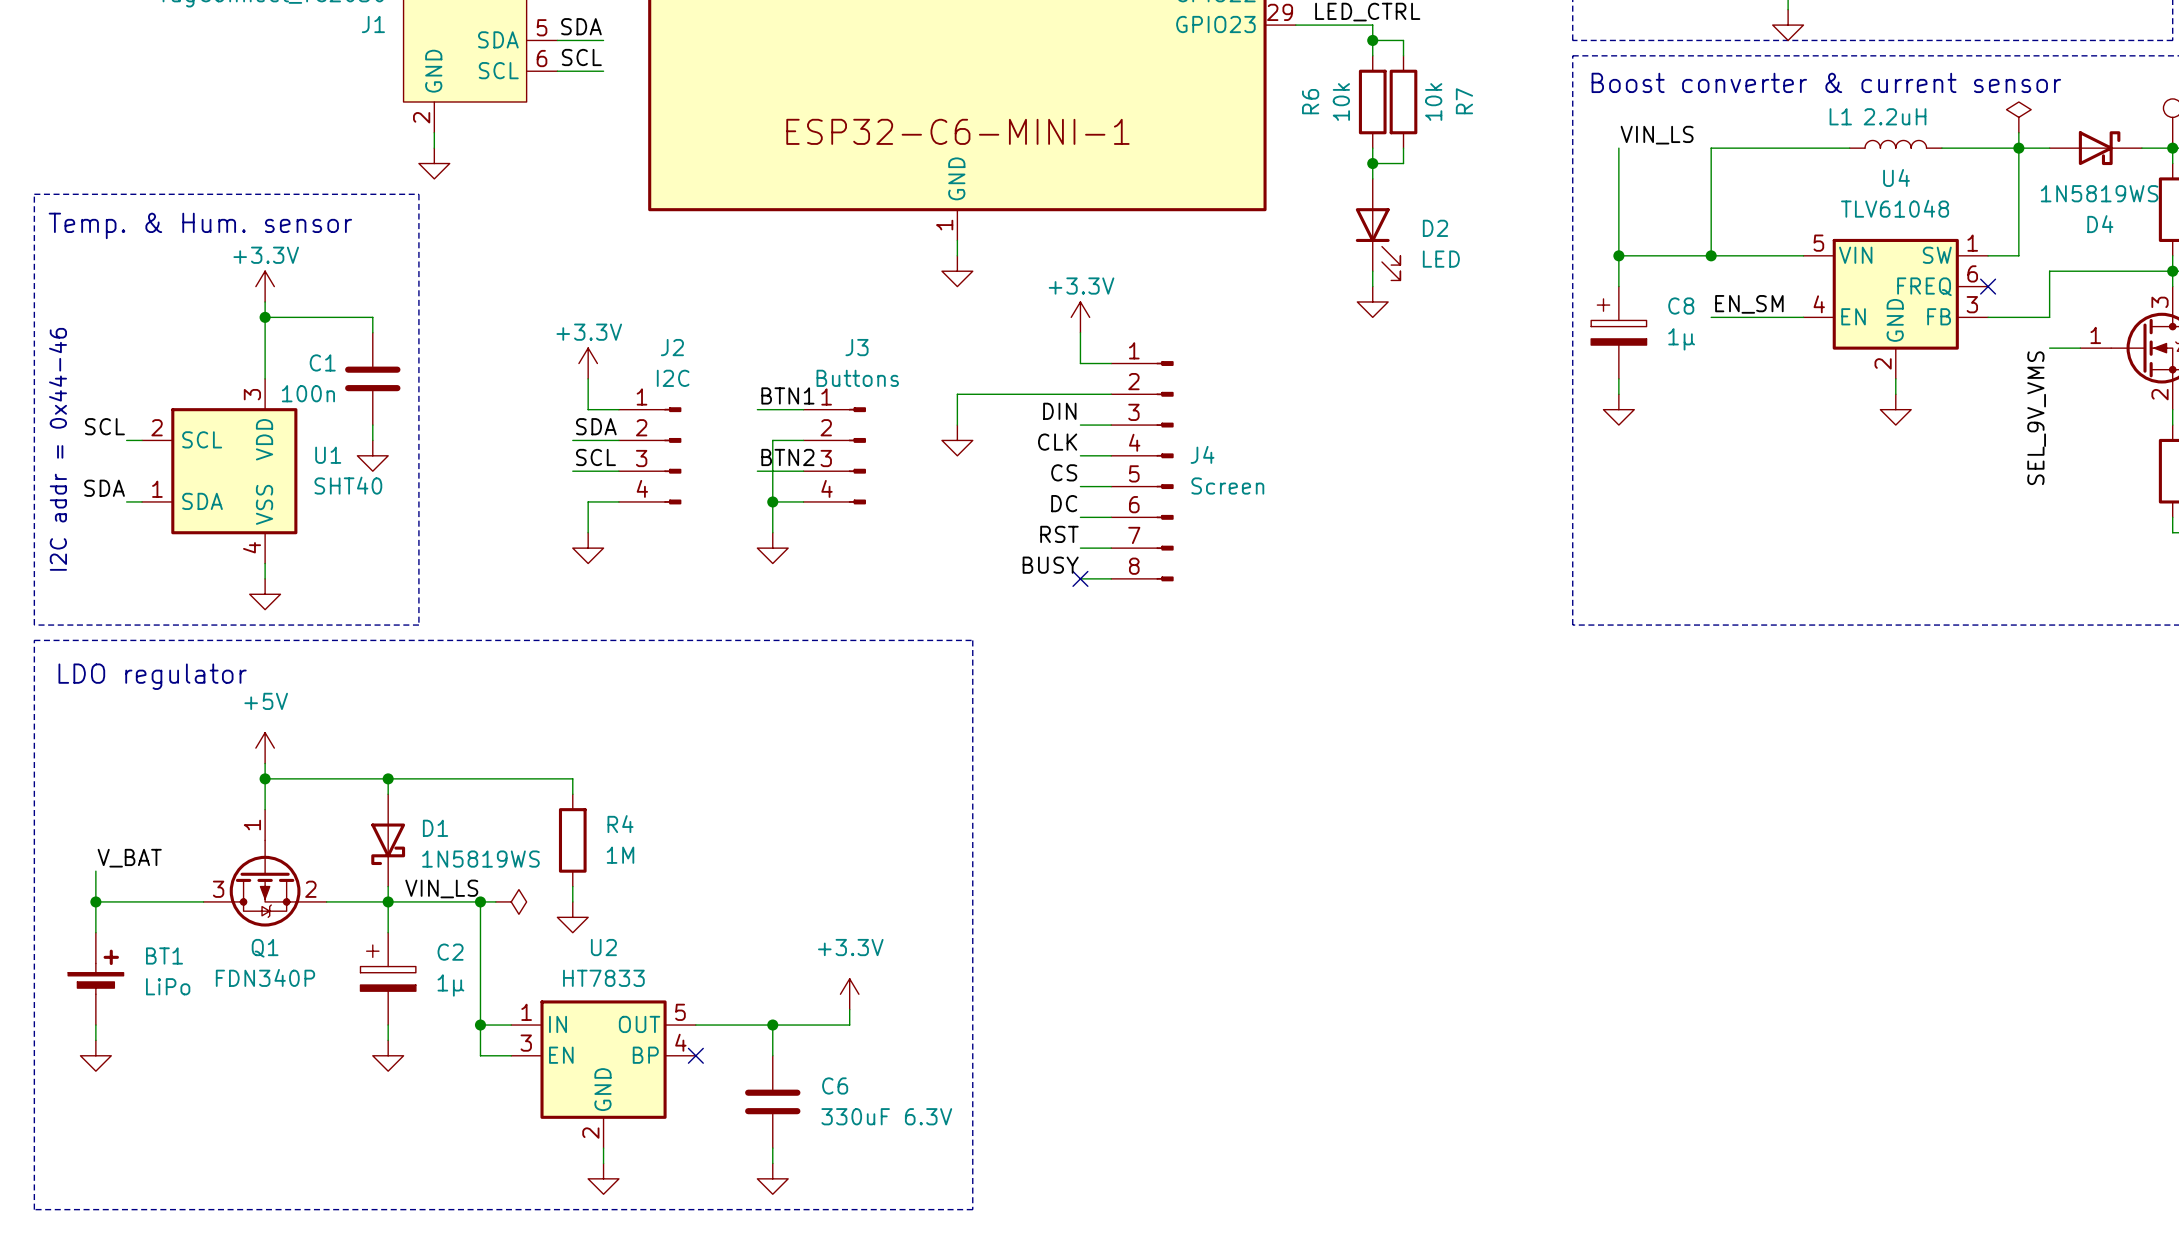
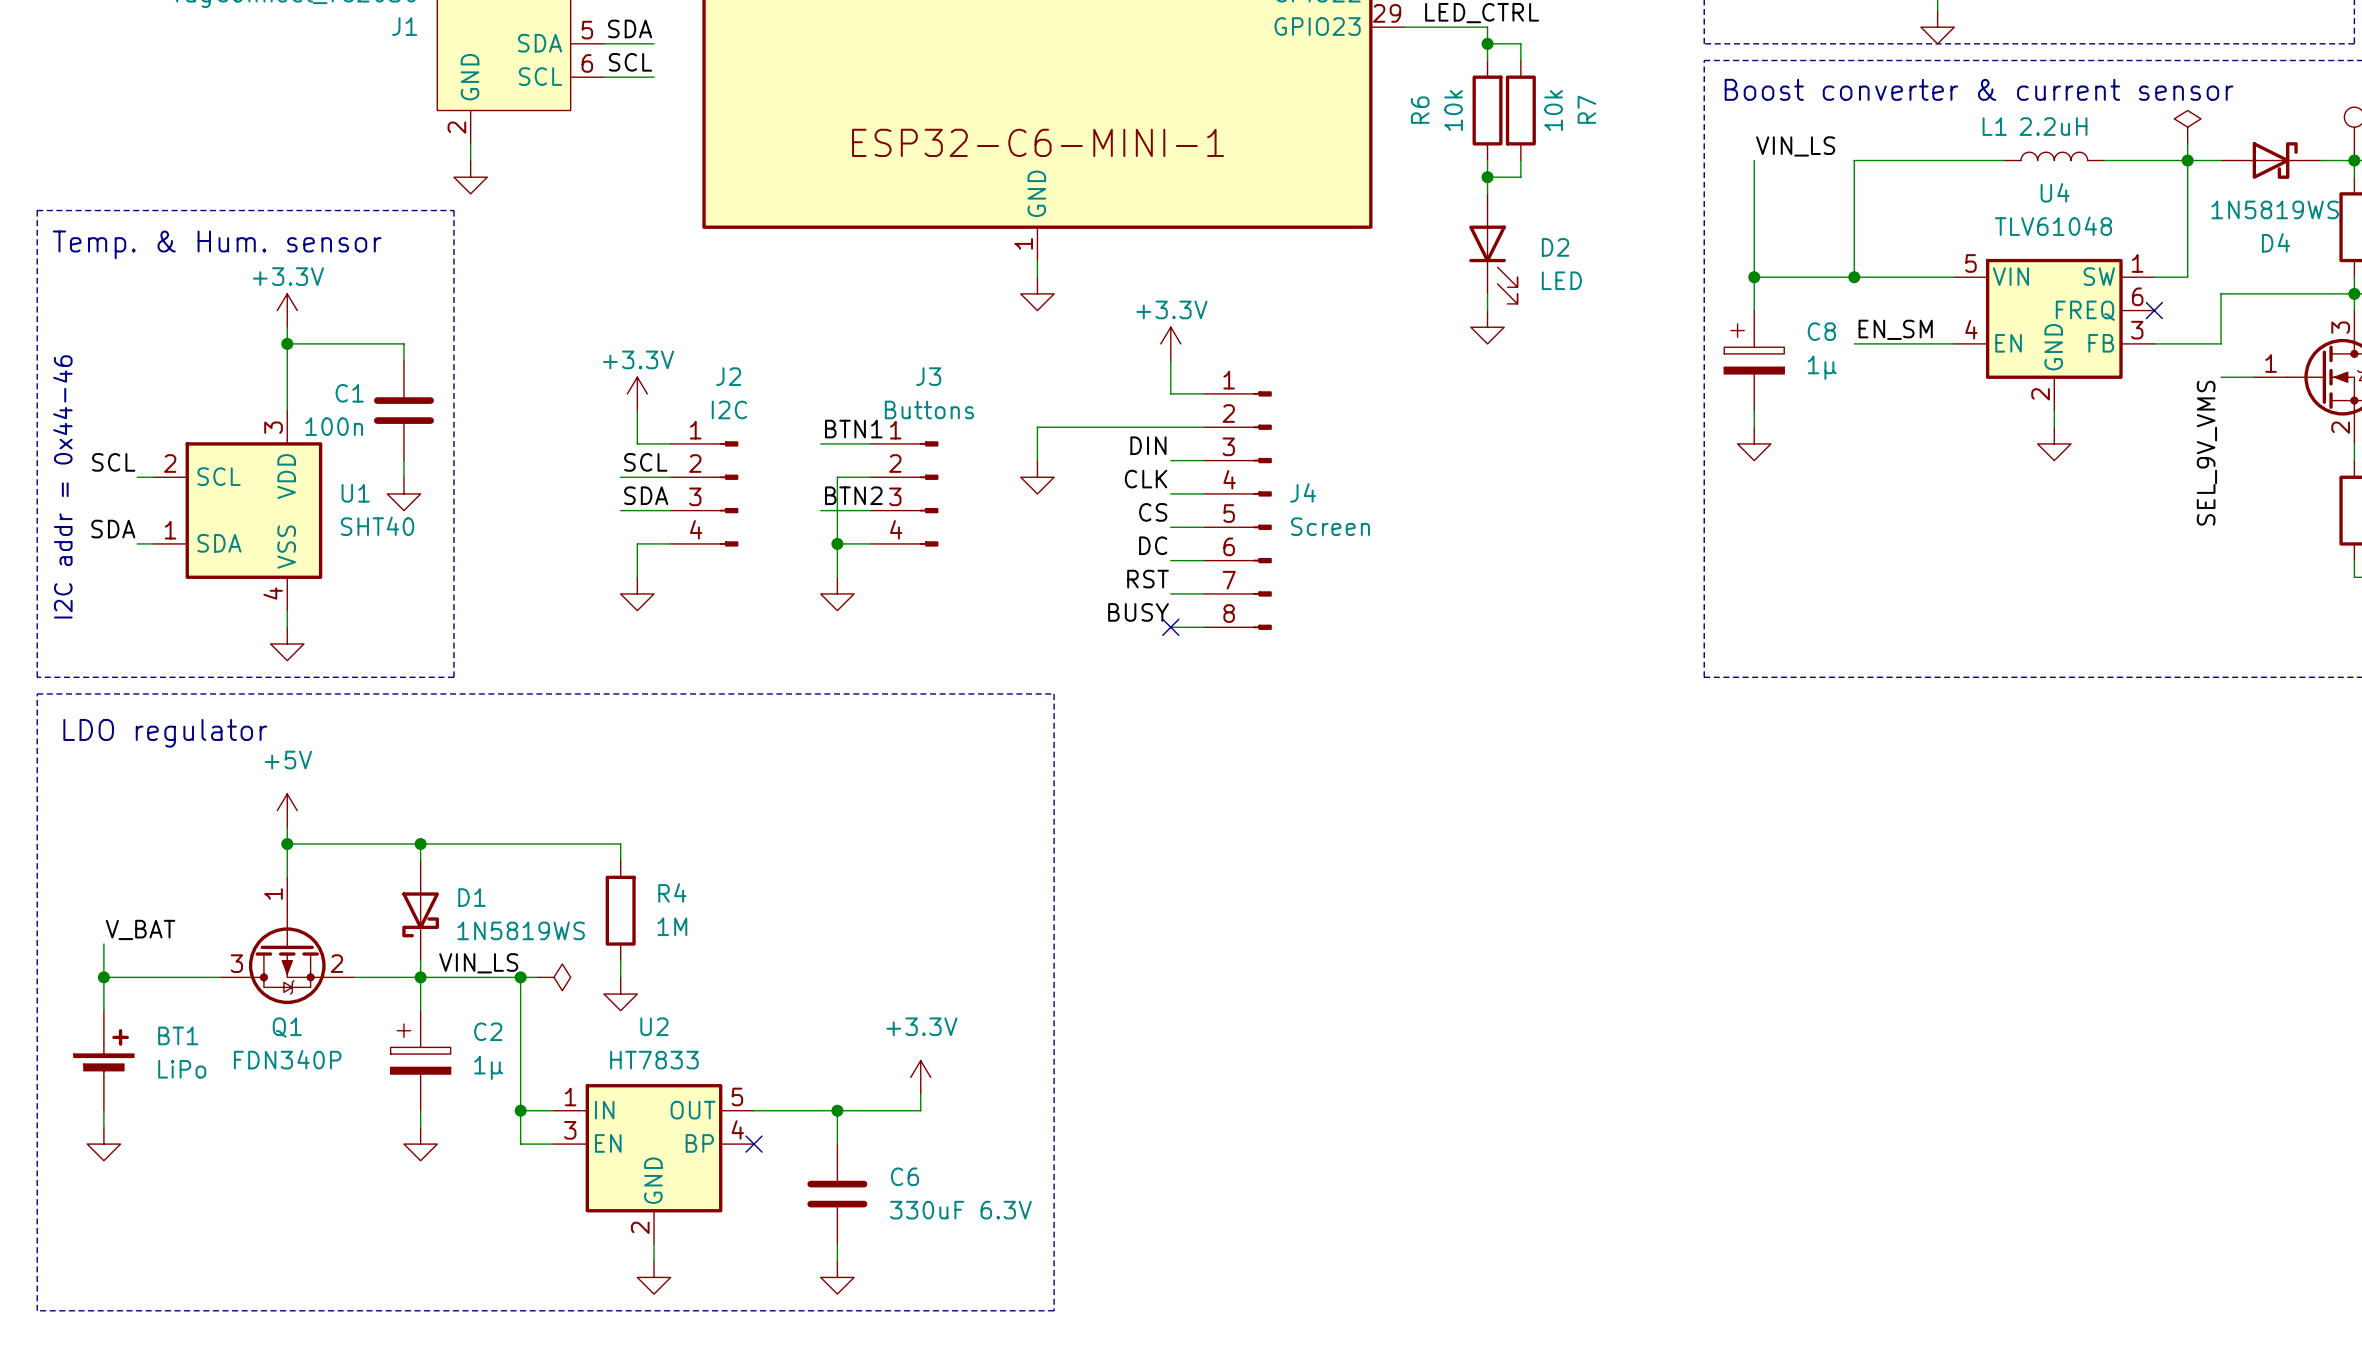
label: SDA (596, 426) -> SCL (645, 462)
label: SCL (595, 457) -> SDA (646, 495)

